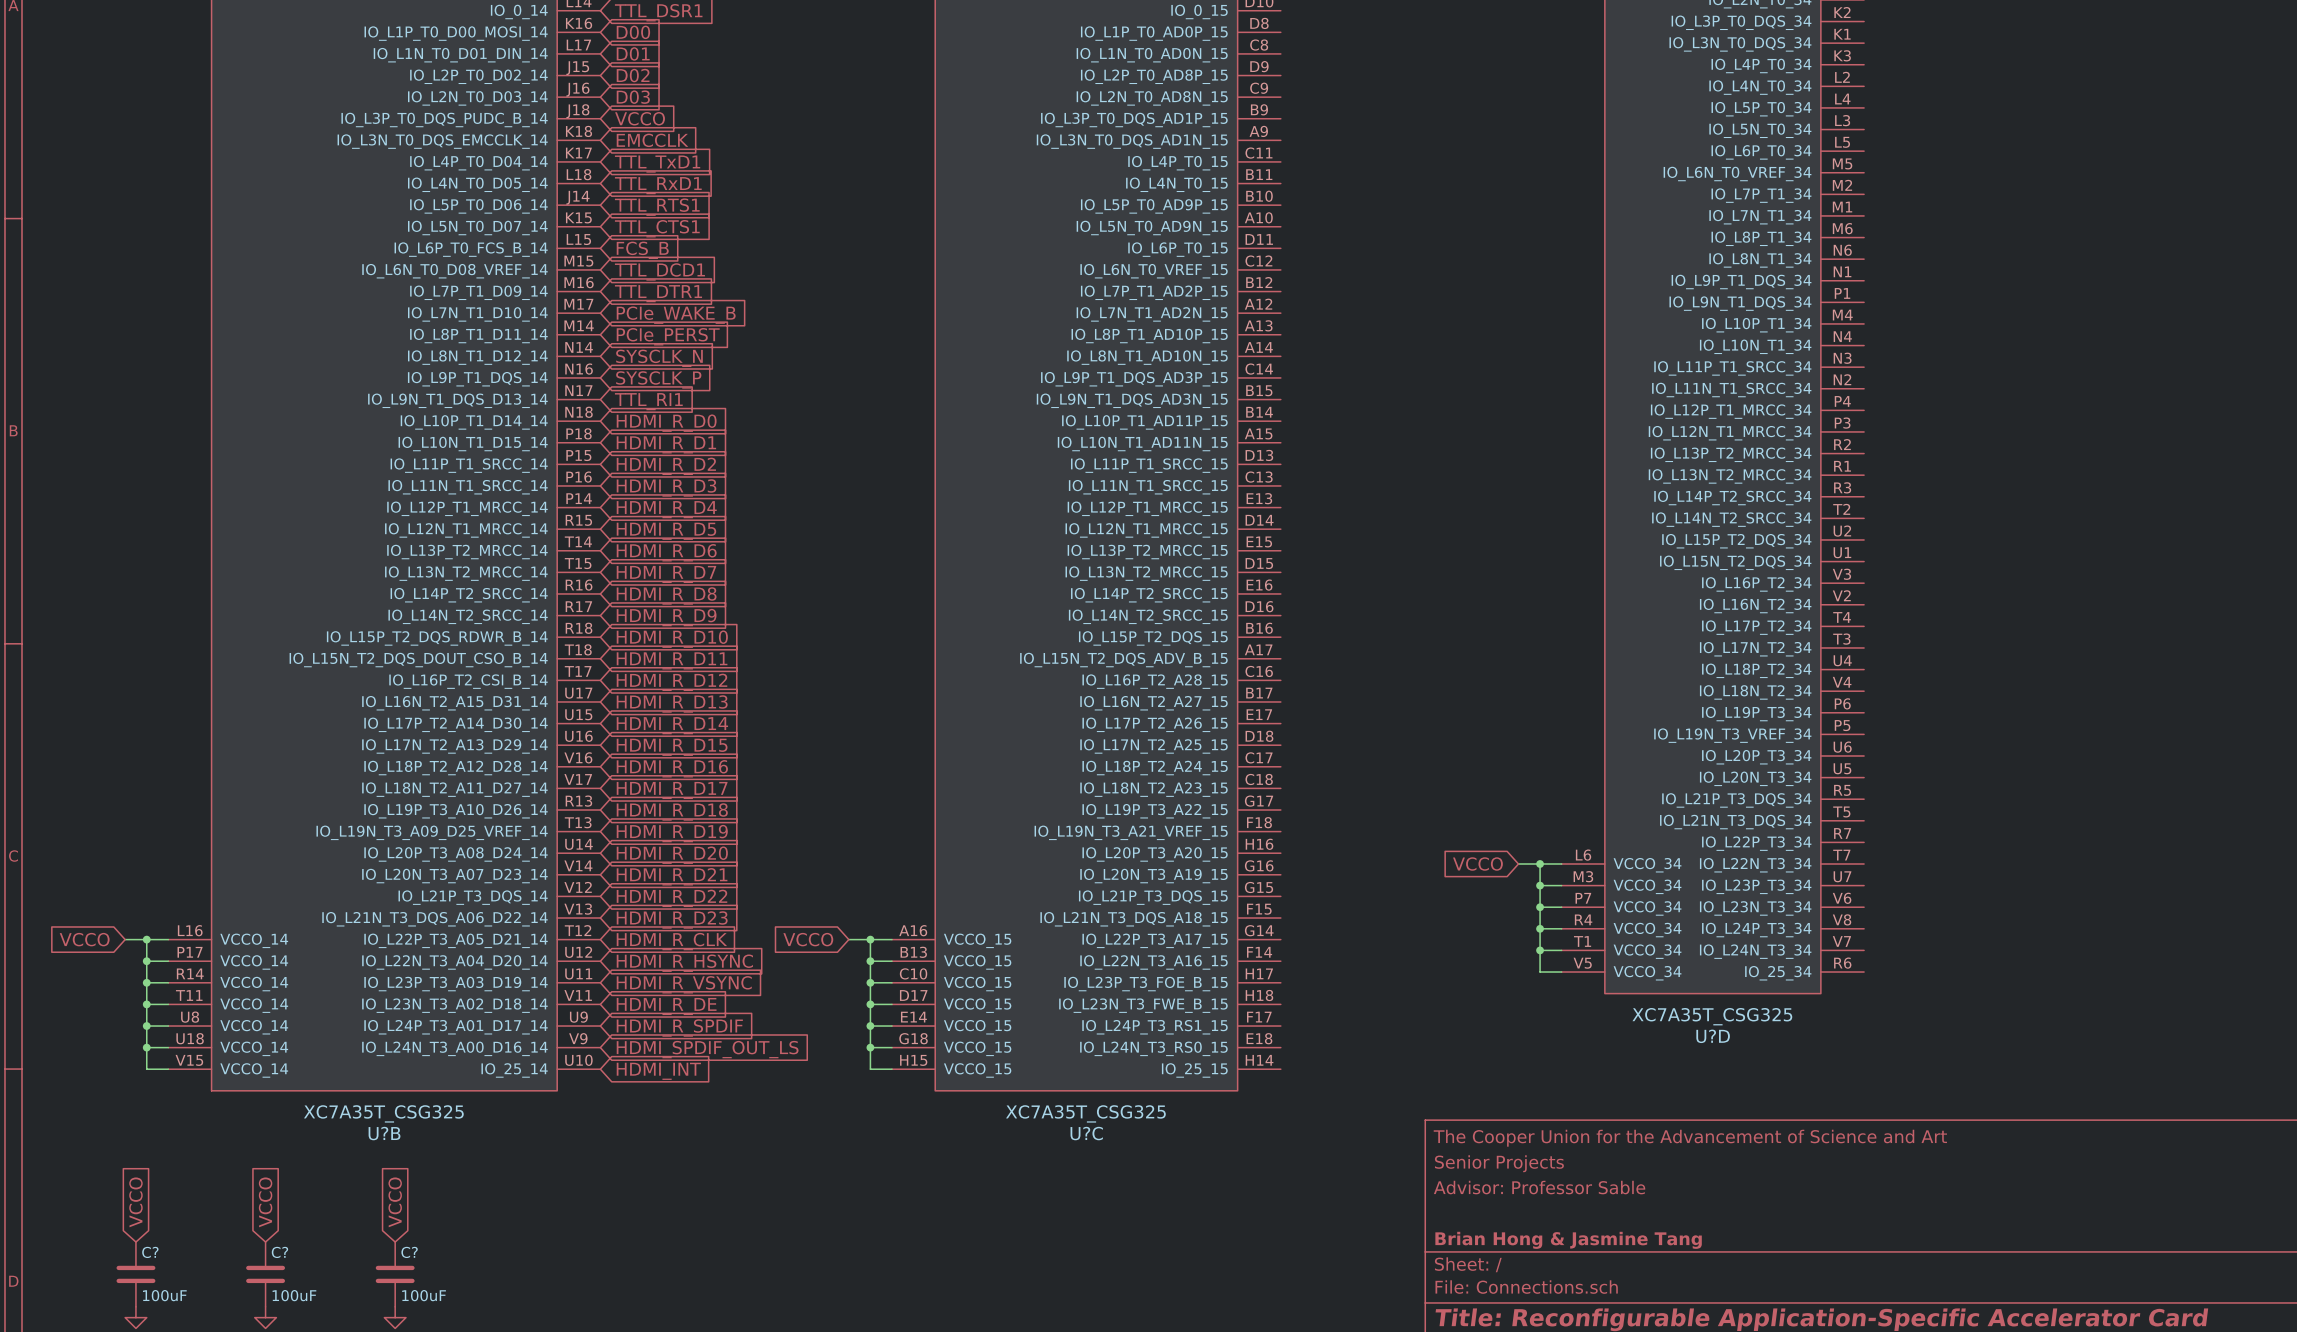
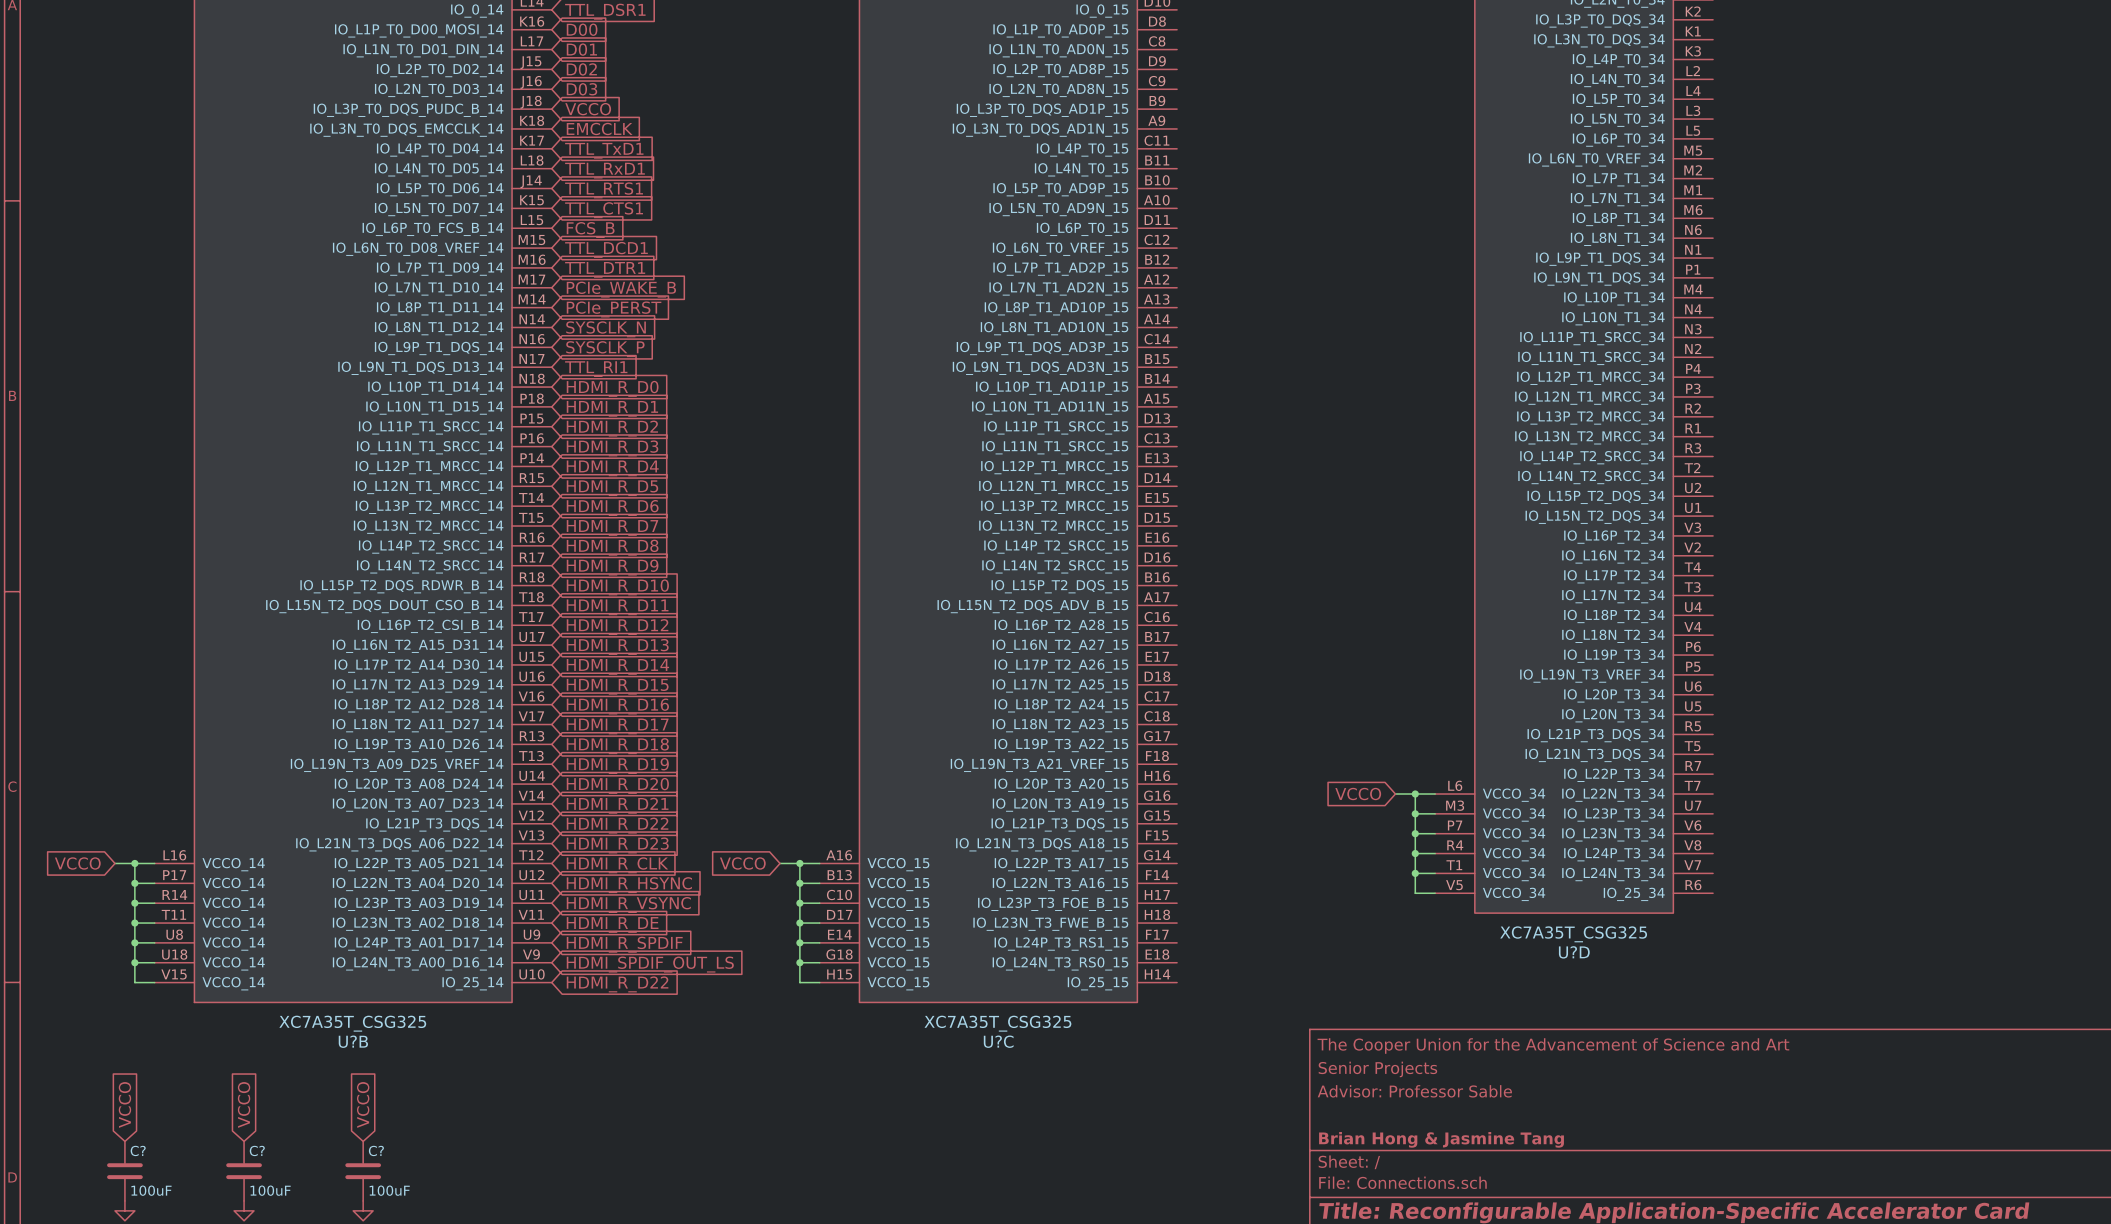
global label: HDMI_INT (658, 1071) -> HDMI_R_D22 (617, 984)

